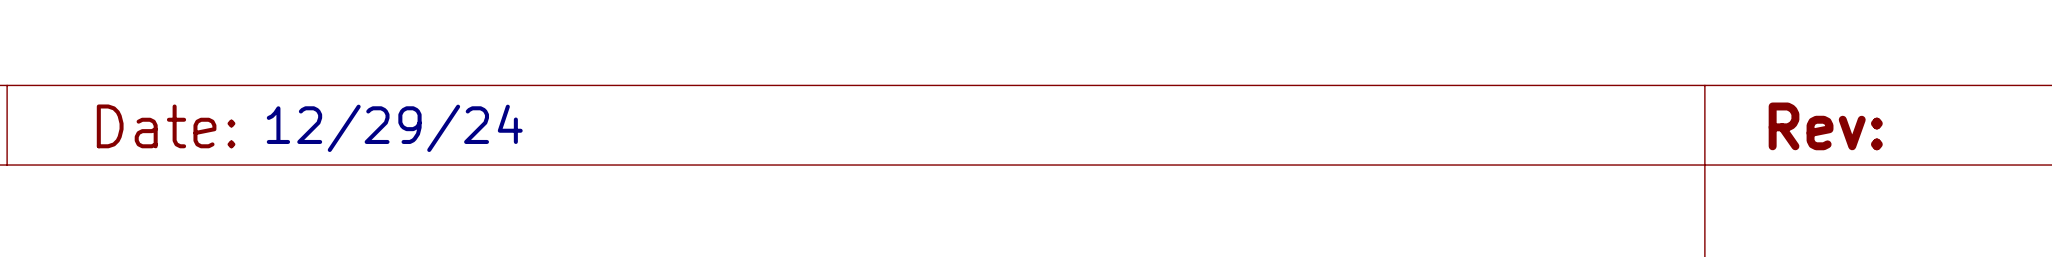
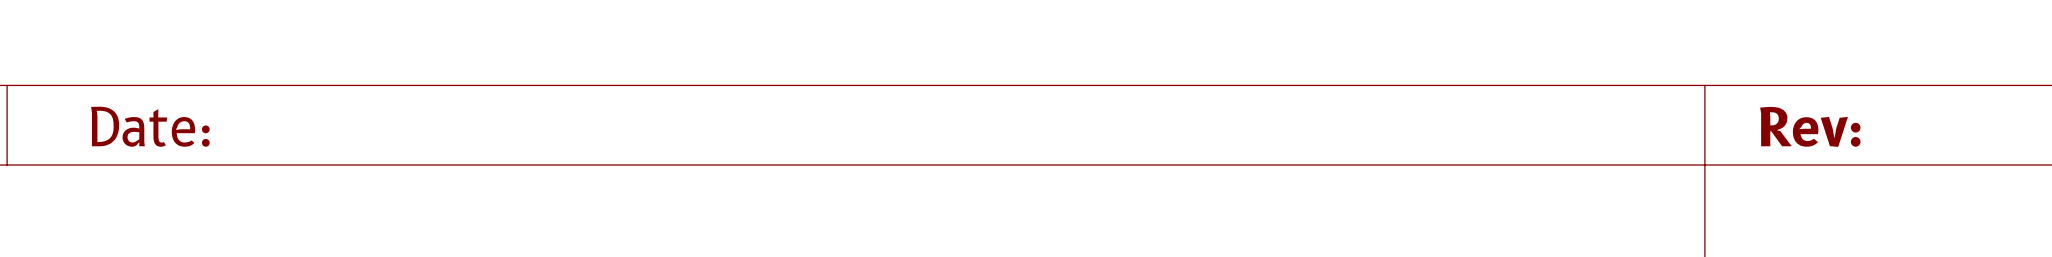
text: 12/29/24 (394, 128) -> none

